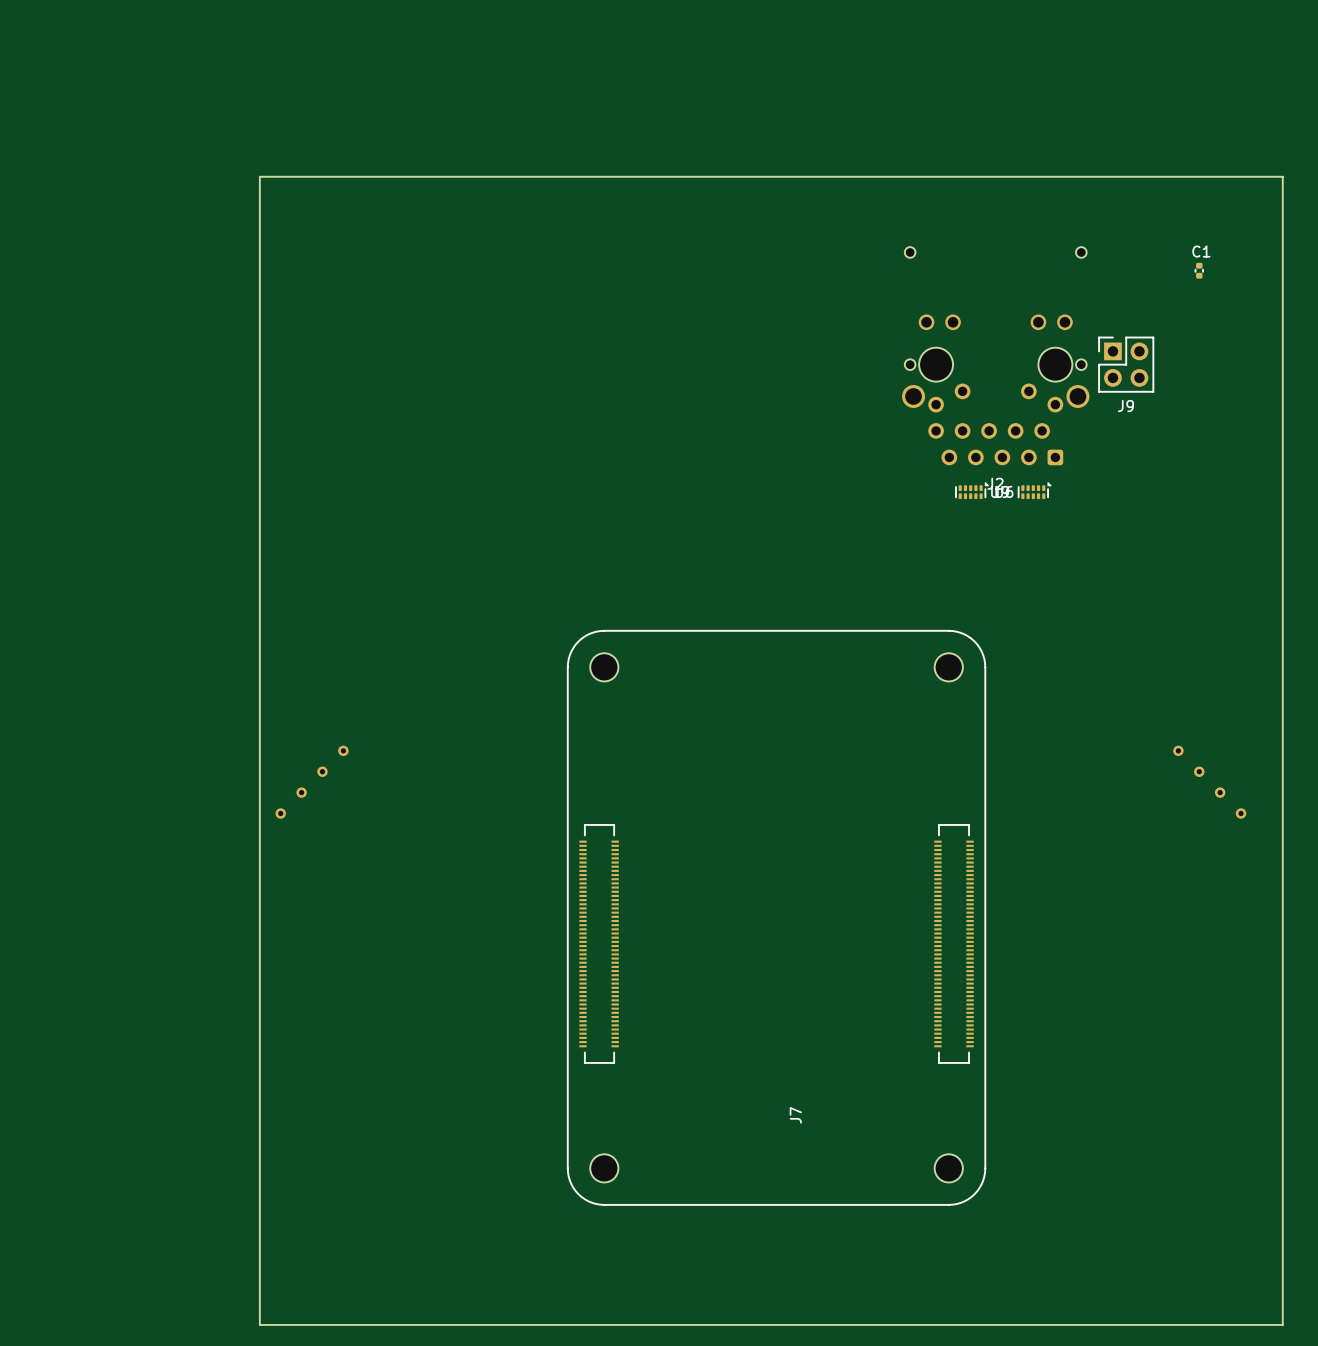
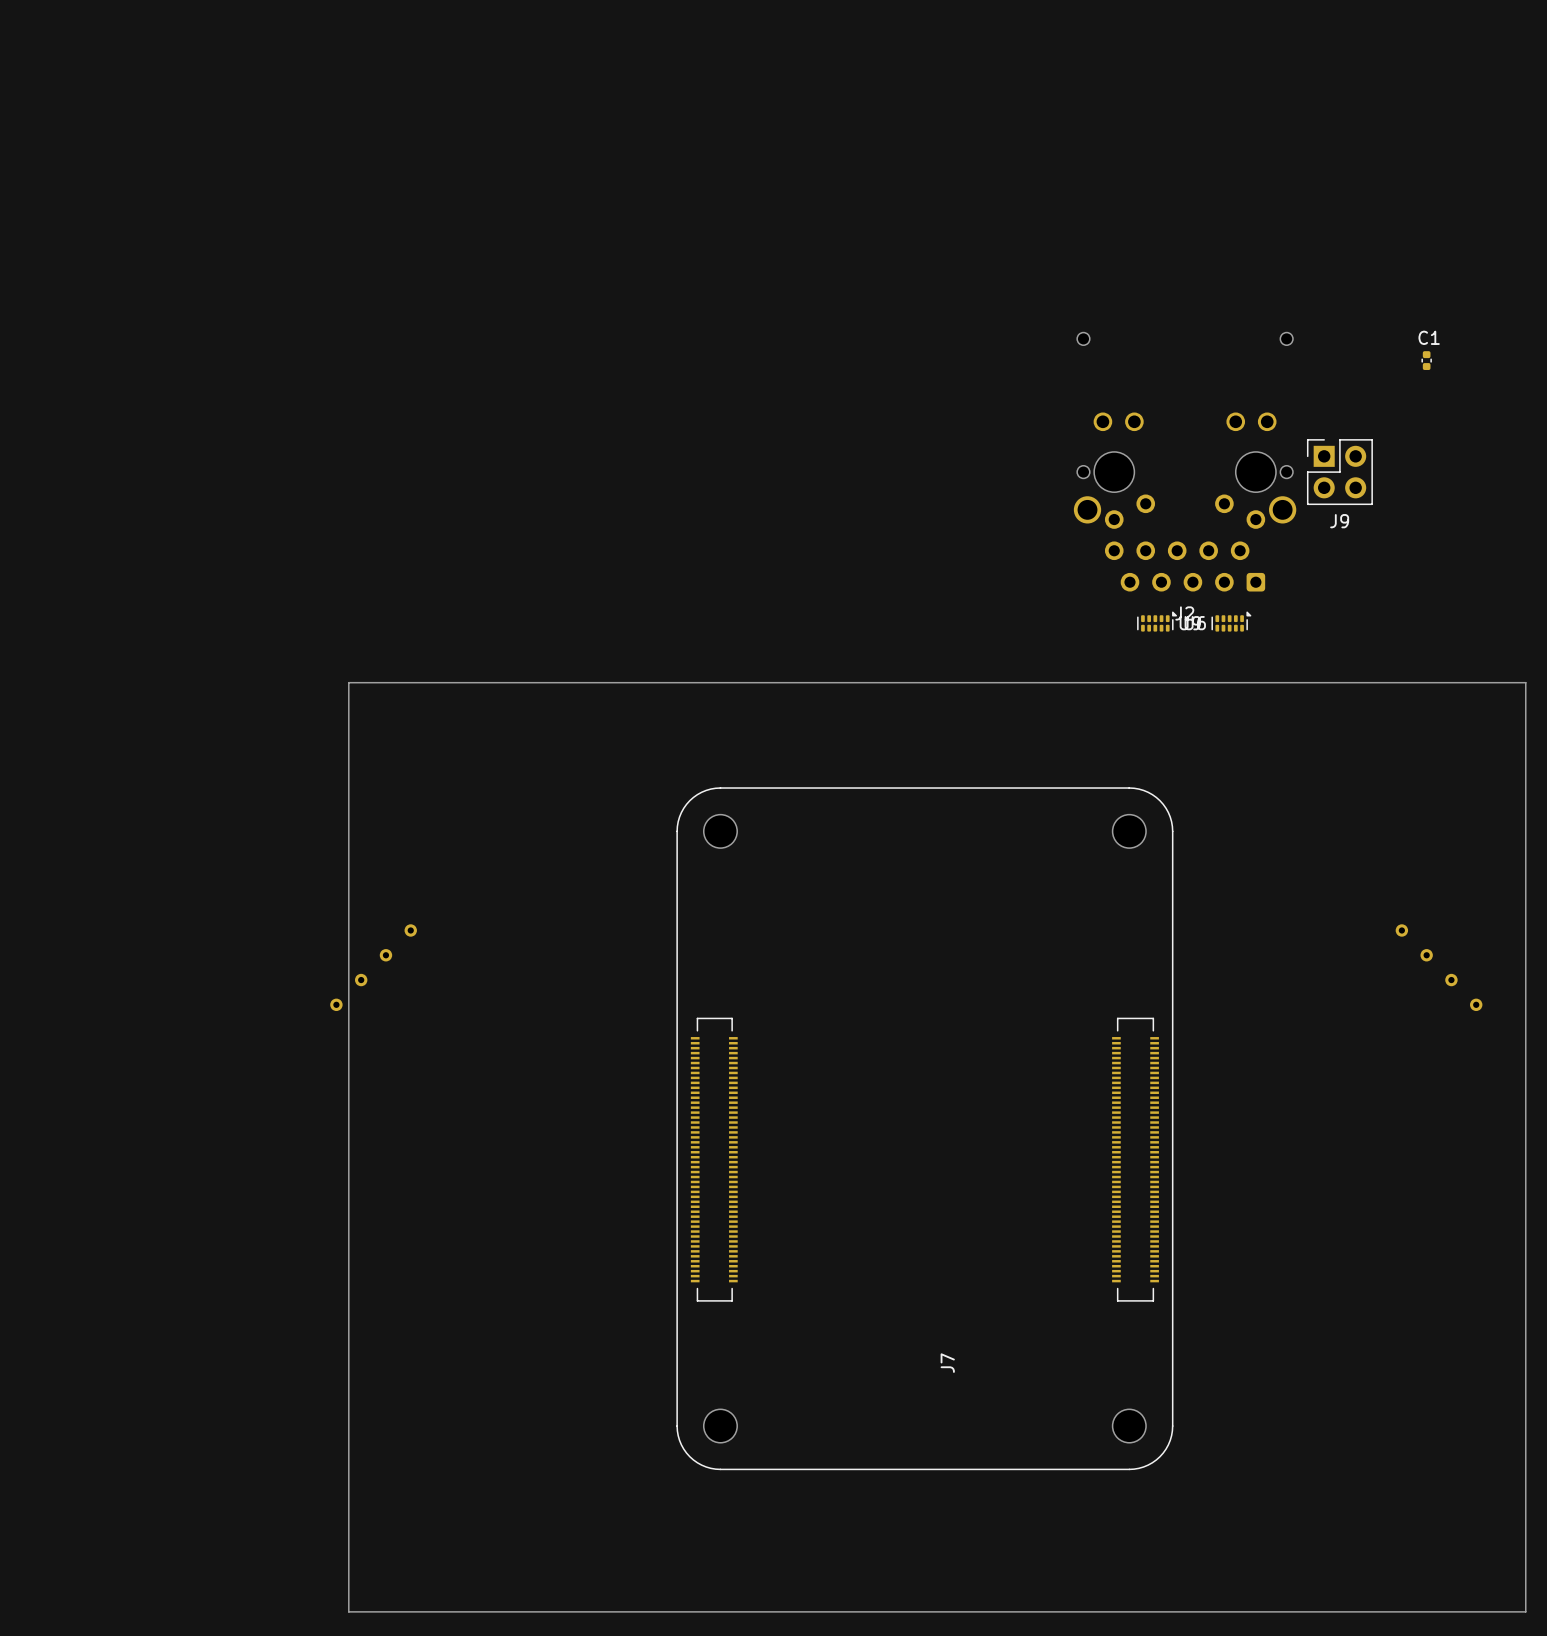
board edge: (1282, 542) (1282, 176) (259, 176) (259, 1324) (291, 1324) -> (1525, 682) (348, 682) (348, 1611)

